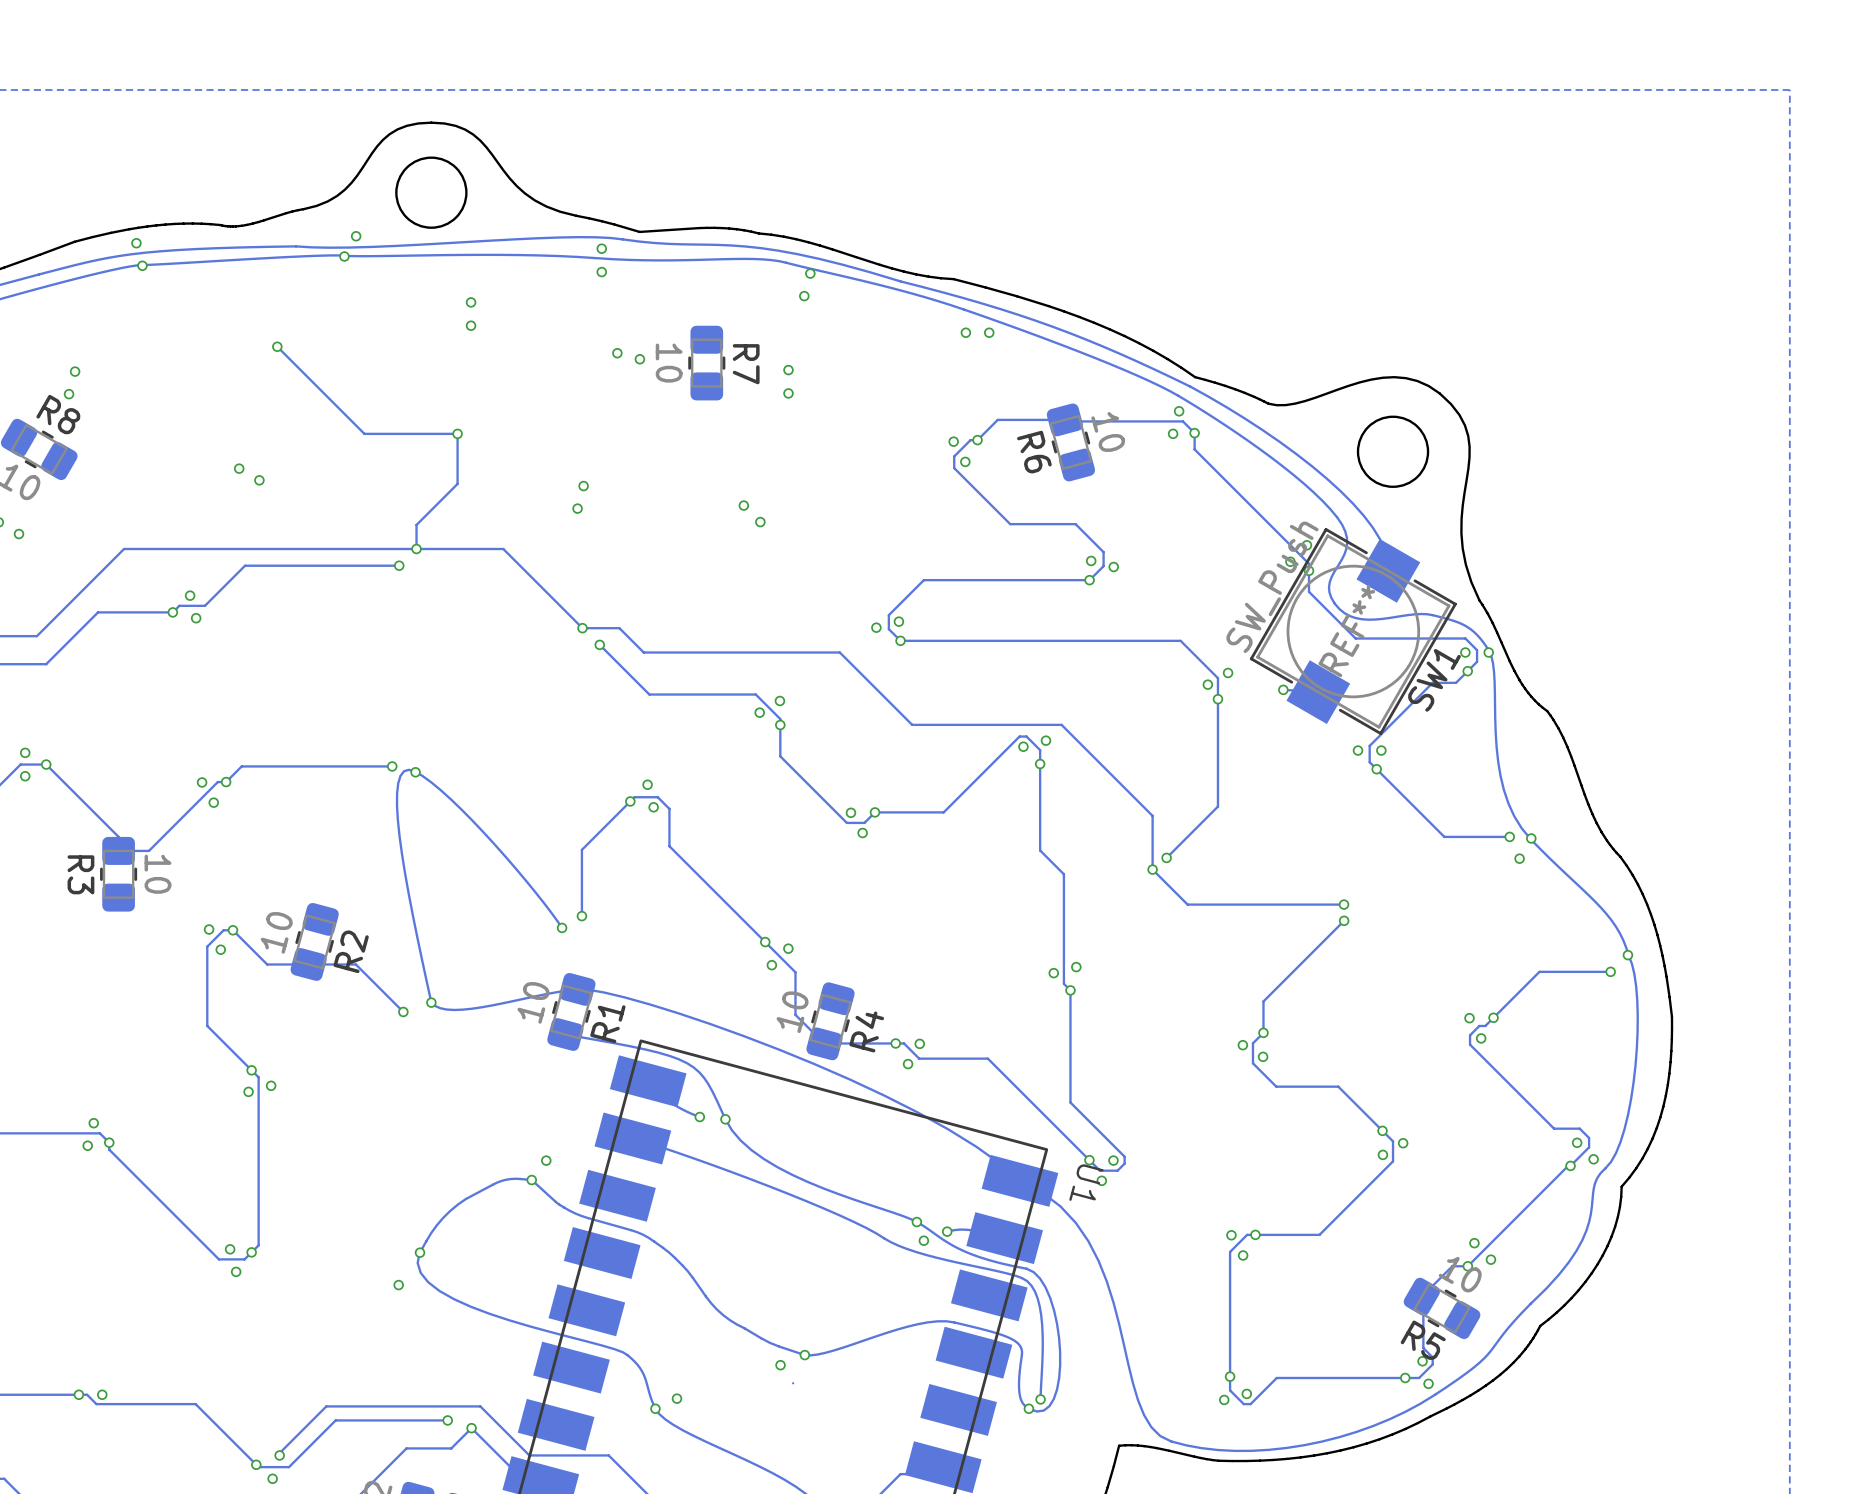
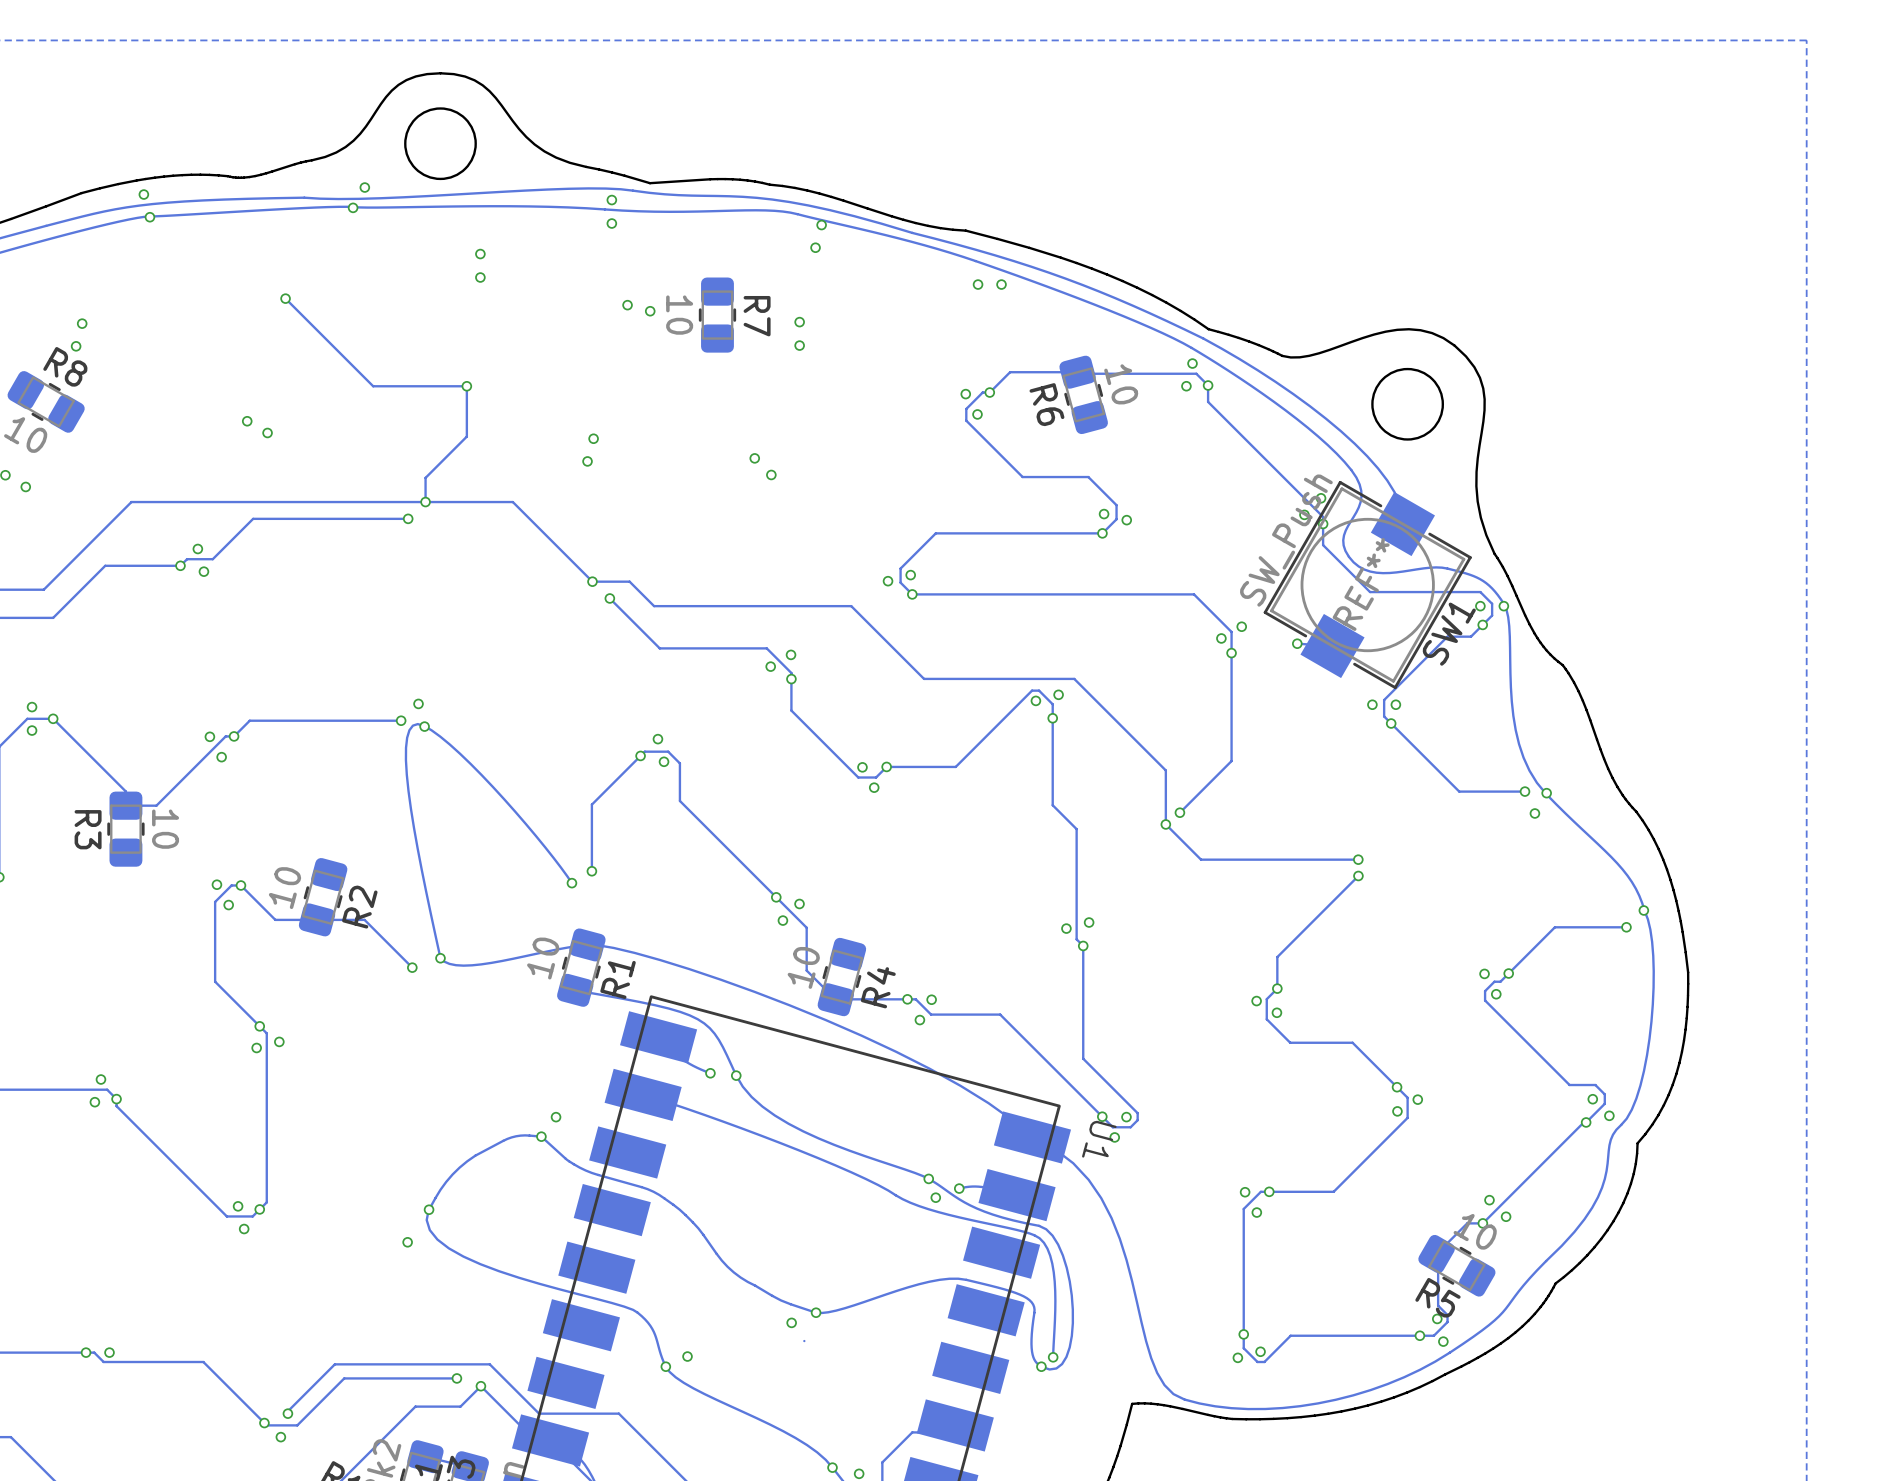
via: none -> (418, 703)

